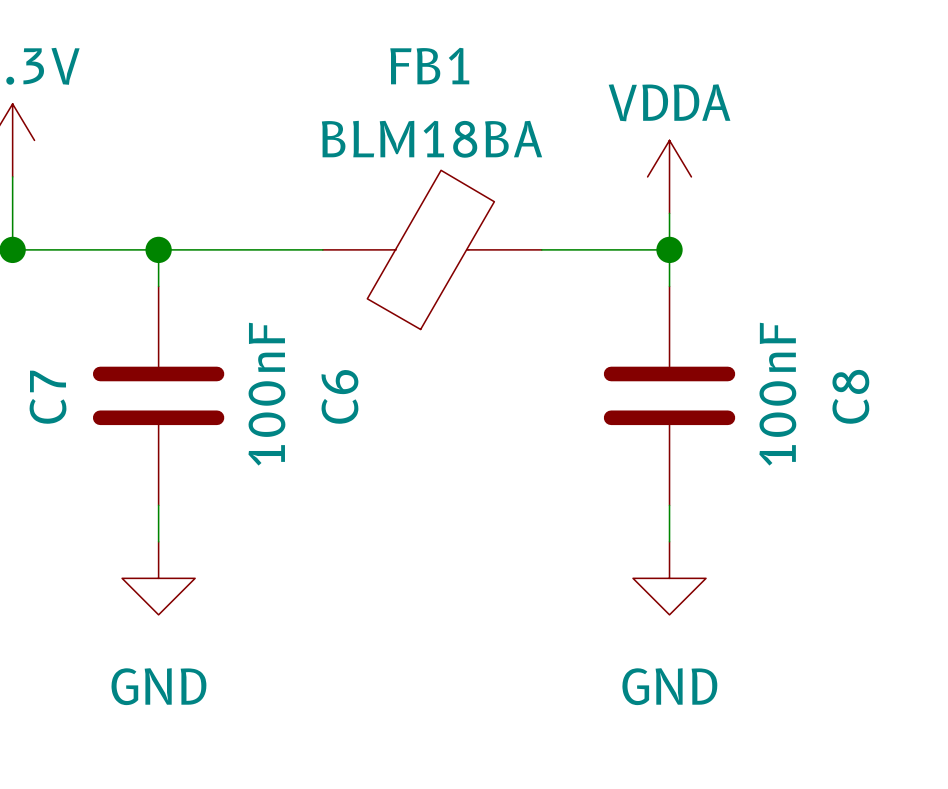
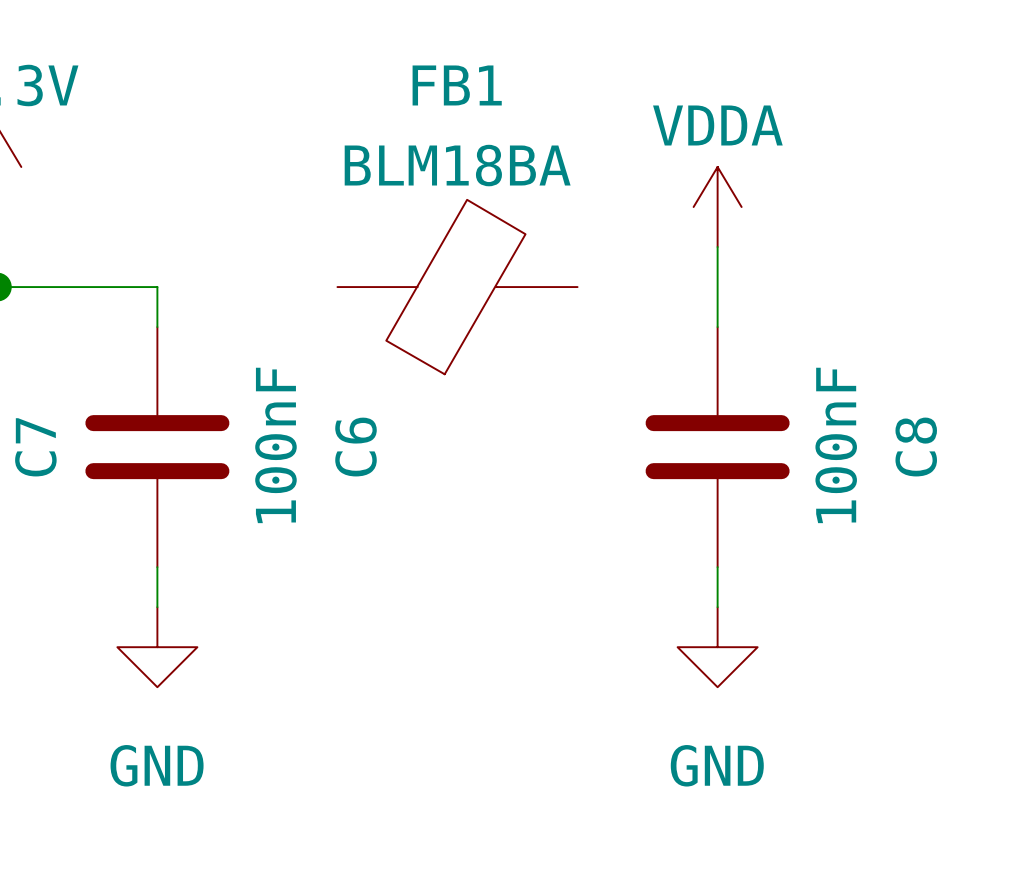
wire: (158, 249) (322, 249) -> none
junction: (158, 249) -> none
wire: (541, 249) (669, 249) -> none
junction: (669, 249) -> none

